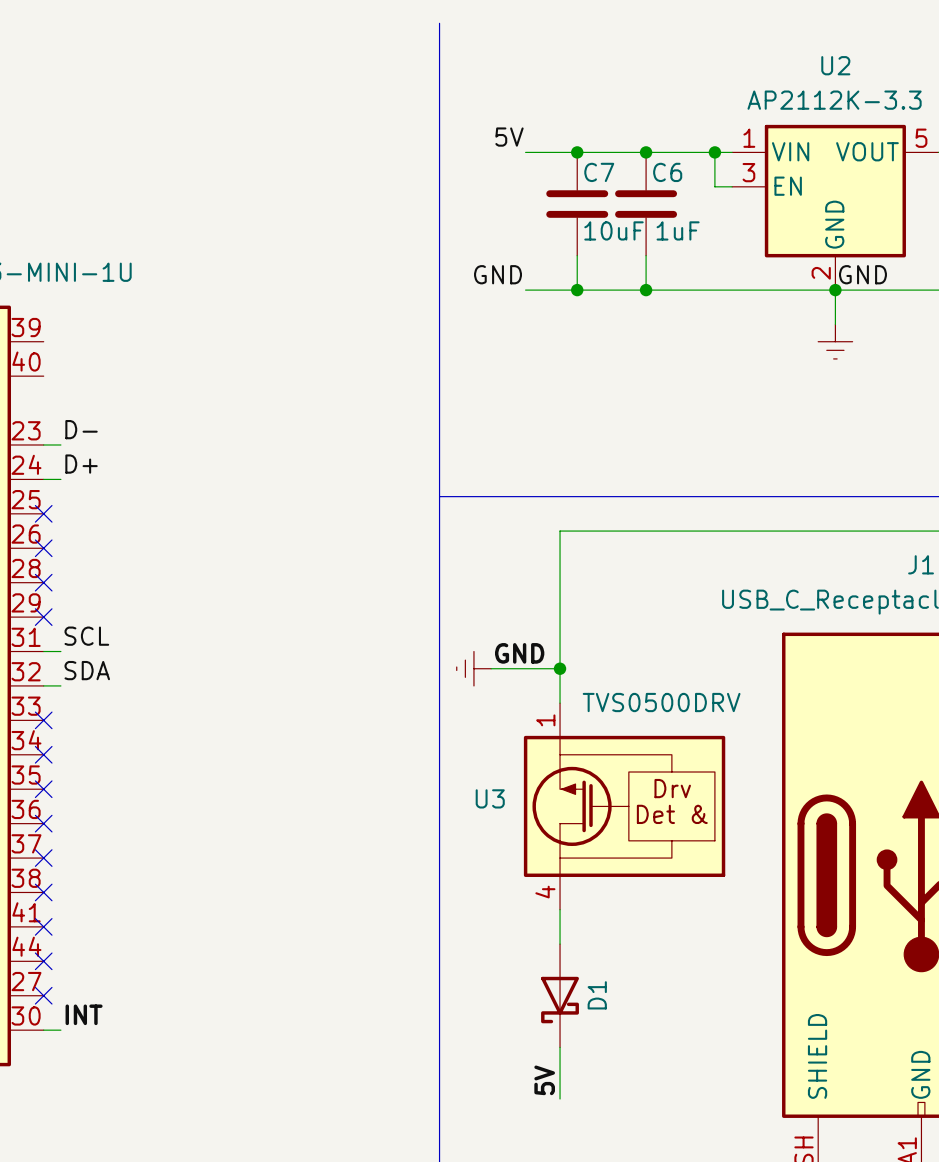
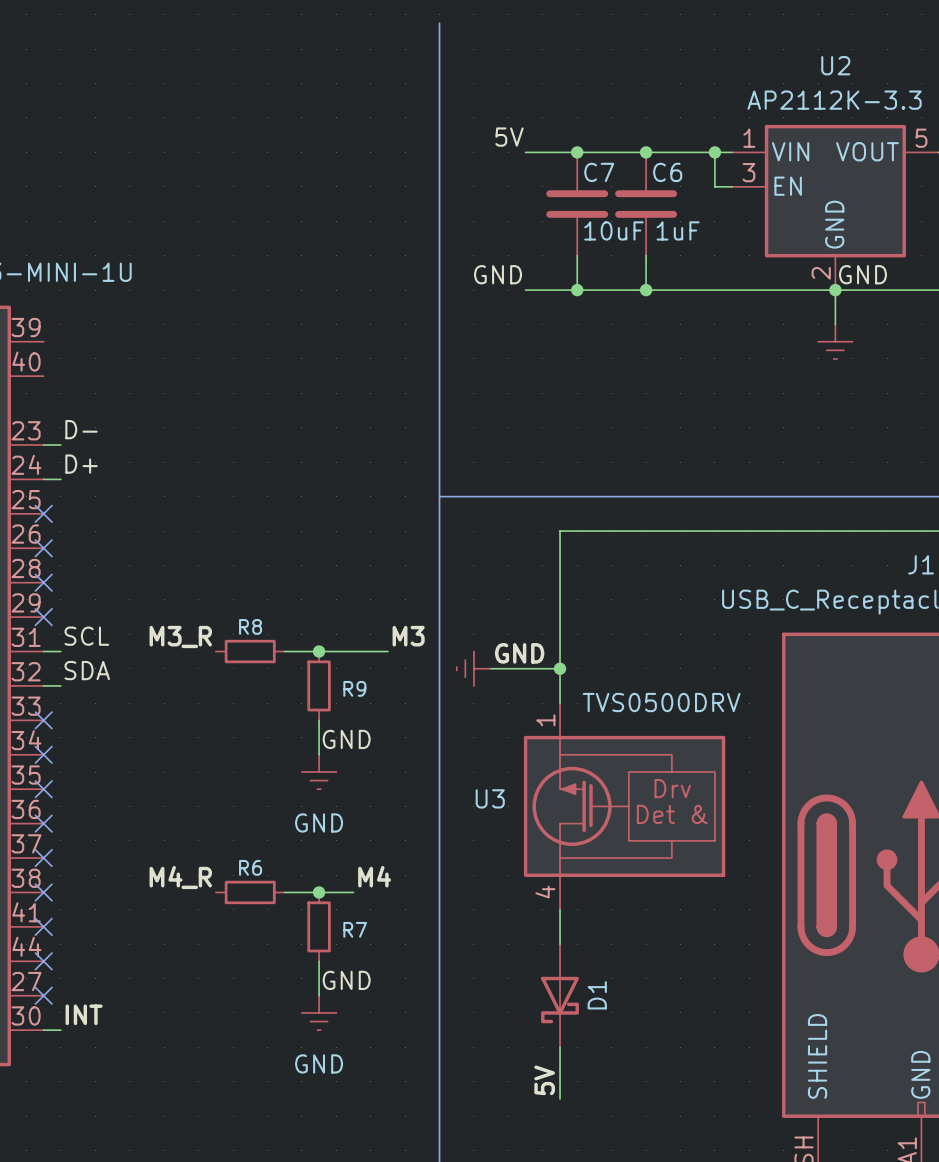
label: none -> M3_R (180, 636)
label: none -> M3 (408, 636)
R8: none -> (250, 651)
wire: none -> (284, 651) (387, 651)
junction: none -> (319, 651)
R9: none -> (319, 685)
wire: none -> (319, 720) (319, 754)
label: none -> GND (346, 739)
power symbol: none -> GND (319, 772)
label: none -> M4 (374, 876)
label: none -> M4_R (180, 877)
R6: none -> (250, 892)
wire: none -> (284, 892) (353, 892)
junction: none -> (319, 892)
R7: none -> (319, 926)
wire: none -> (319, 961) (319, 995)
label: none -> GND (346, 980)
power symbol: none -> GND (319, 1012)

